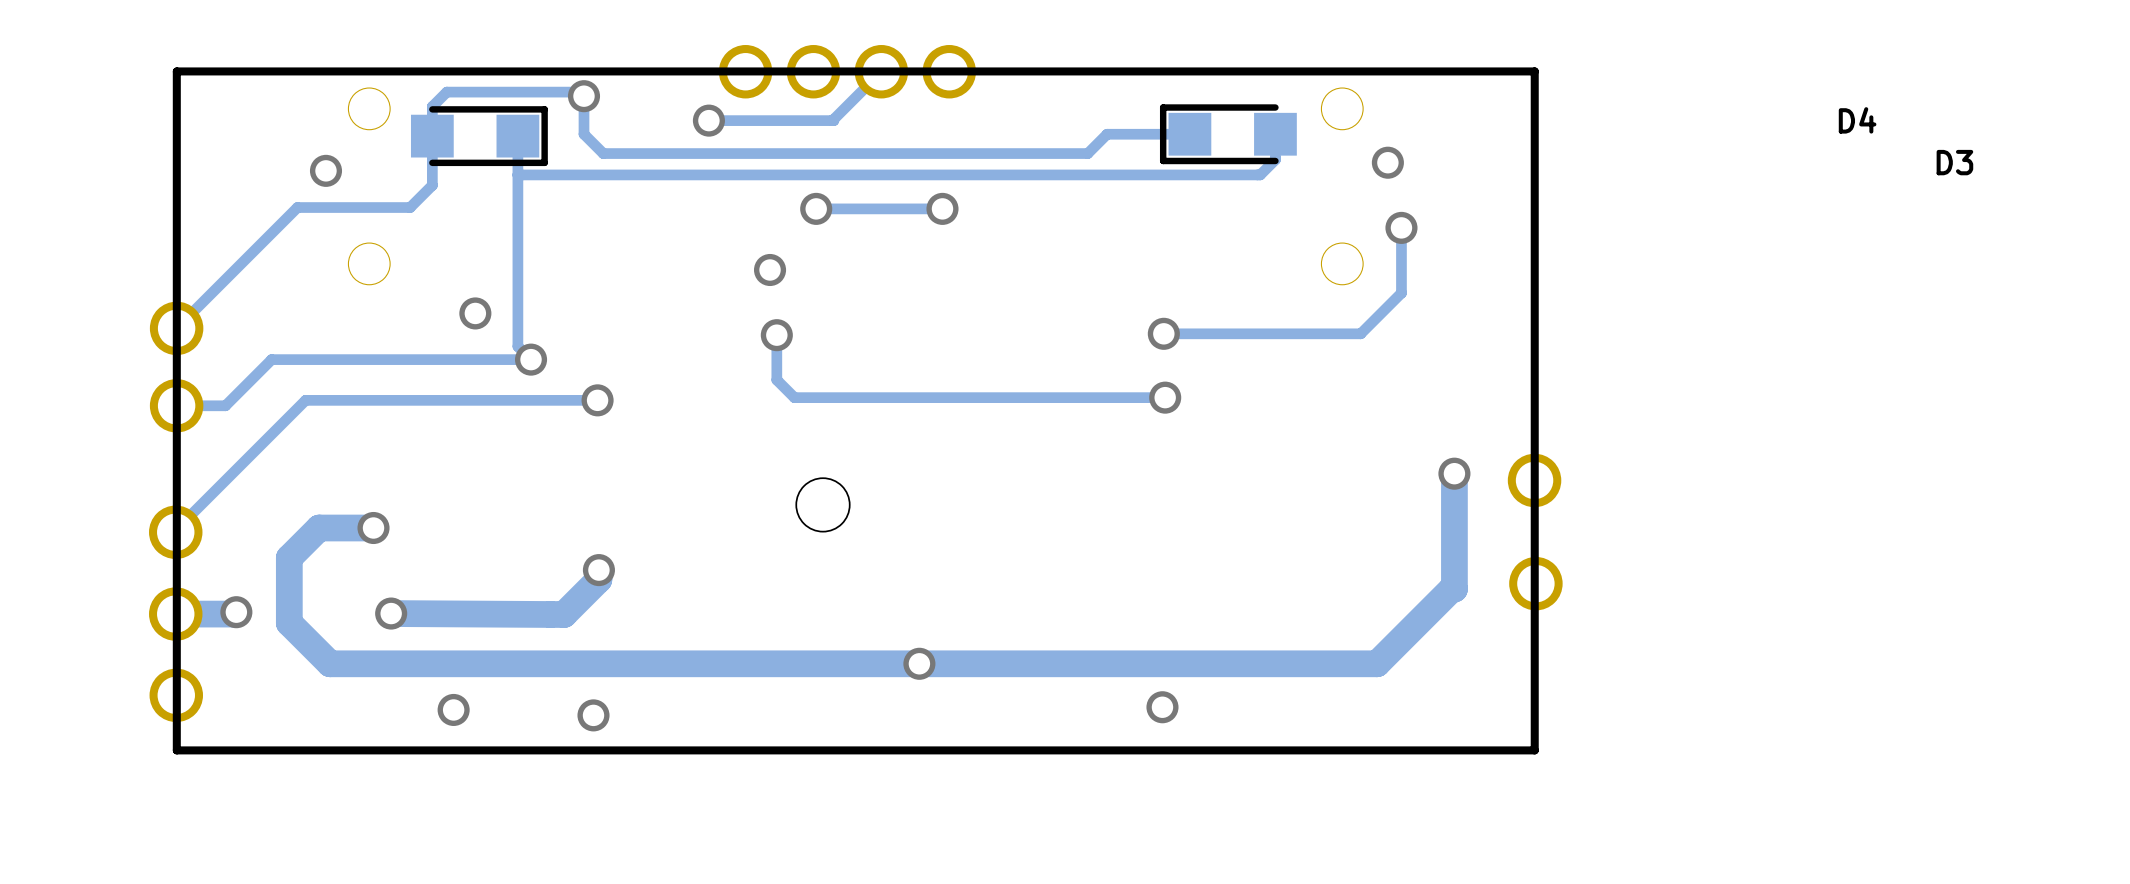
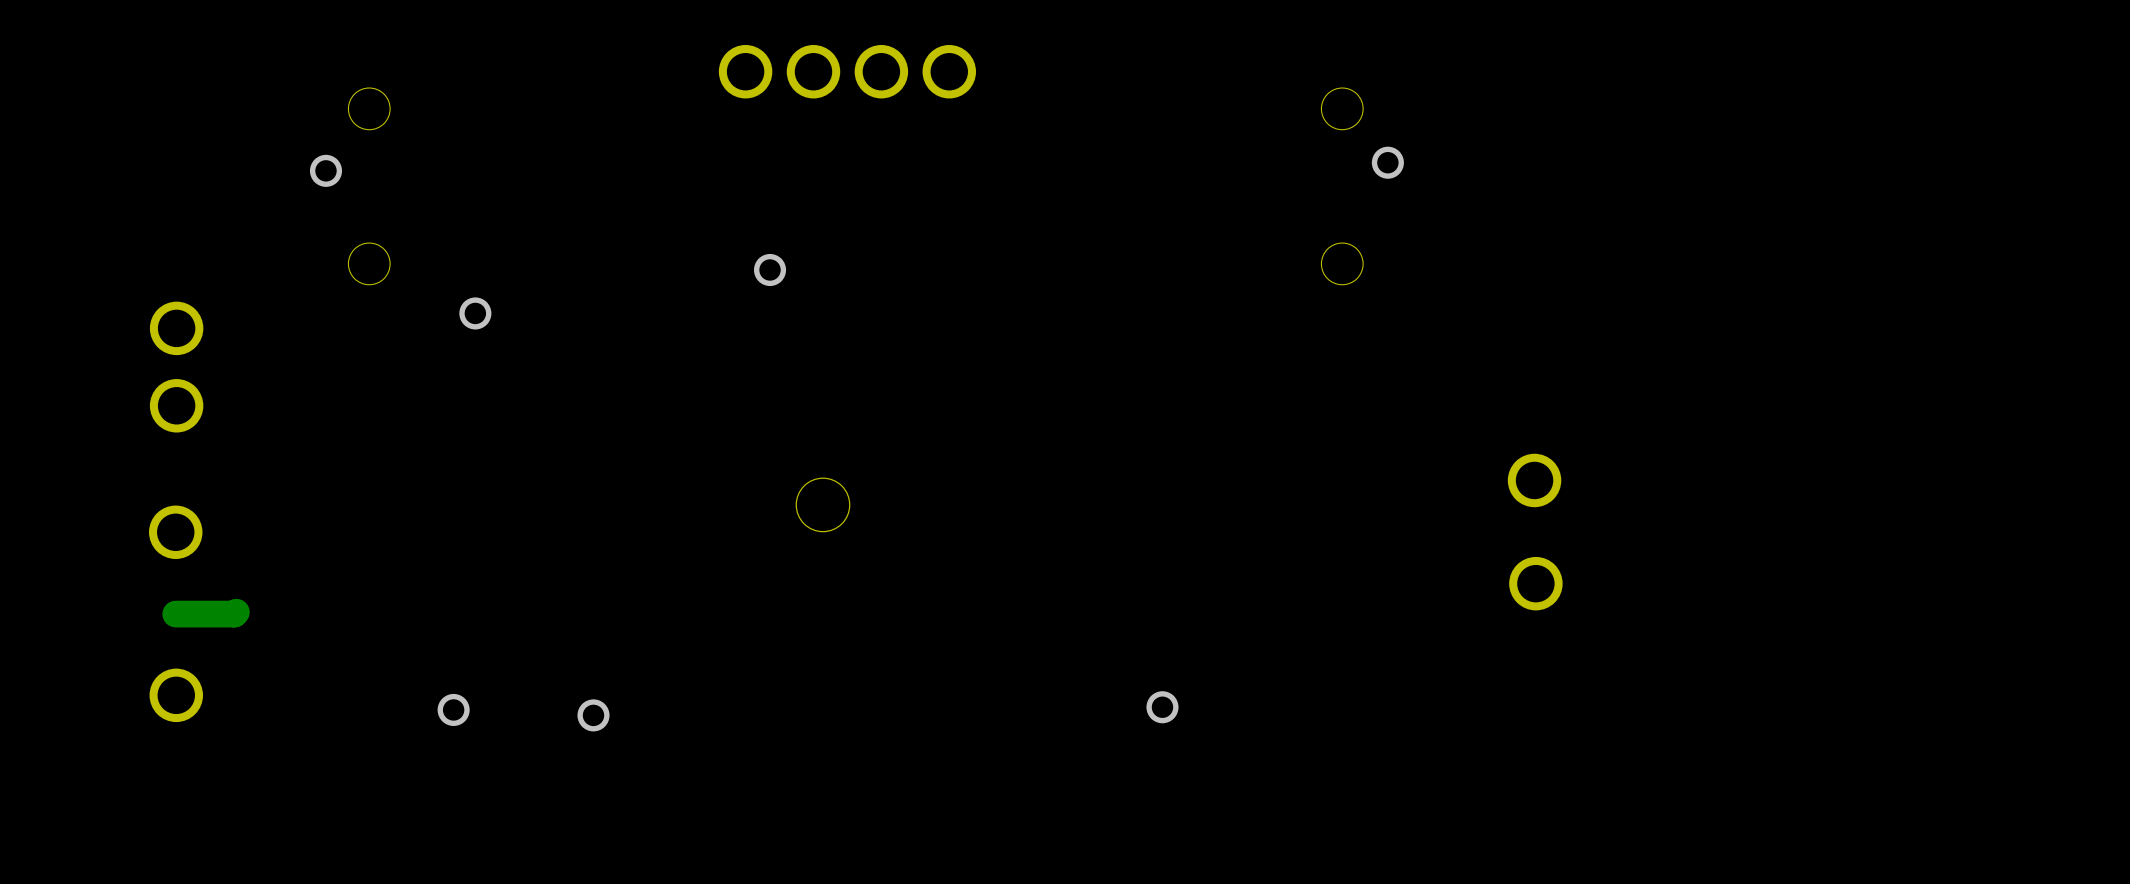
track: (881, 71) (832, 120) -> none
board edge: (1534, 71) (1534, 750) (176, 750) (176, 71) (1534, 71) -> none
via: (583, 96) -> none
track: (833, 119) (708, 120) -> none
via: (708, 120) -> none
track: (1189, 134) (1107, 134) (1087, 153) (603, 153) (583, 134) (583, 96) (579, 92) (446, 92) (432, 106) (432, 185) (410, 207) (297, 207) (176, 328) -> none
D3: (1228, 134) -> none
track: (1275, 134) (1275, 159) (1260, 174) (517, 174) -> none
D4: (479, 136) -> none
track: (517, 136) (517, 346) (531, 359) (271, 359) (225, 405) (176, 405) -> none
via: (816, 208) -> none
track: (942, 208) (816, 208) -> none
via: (942, 208) -> none
track: (1401, 227) (1401, 293) (1360, 333) (1163, 333) -> none
via: (1401, 227) -> none
via: (1163, 333) -> none
track: (776, 335) (776, 379) (794, 397) (1165, 397) -> none
via: (776, 335) -> none
via: (531, 359) -> none
via: (1165, 397) -> none
track: (597, 400) (305, 400) (175, 532) -> none
via: (597, 400) -> none
track: (1454, 473) (1454, 589) (1451, 589) (1377, 663) (330, 663) (289, 623) (289, 557) (319, 528) (373, 528) -> none
via: (1454, 473) -> none
via: (373, 528) -> none
track: (598, 570) (598, 579) (564, 614) (391, 613) -> none
via: (598, 570) -> none
via: (236, 612) -> none
via: (391, 613) -> none
part: (175, 614) -> none
via: (919, 663) -> none

